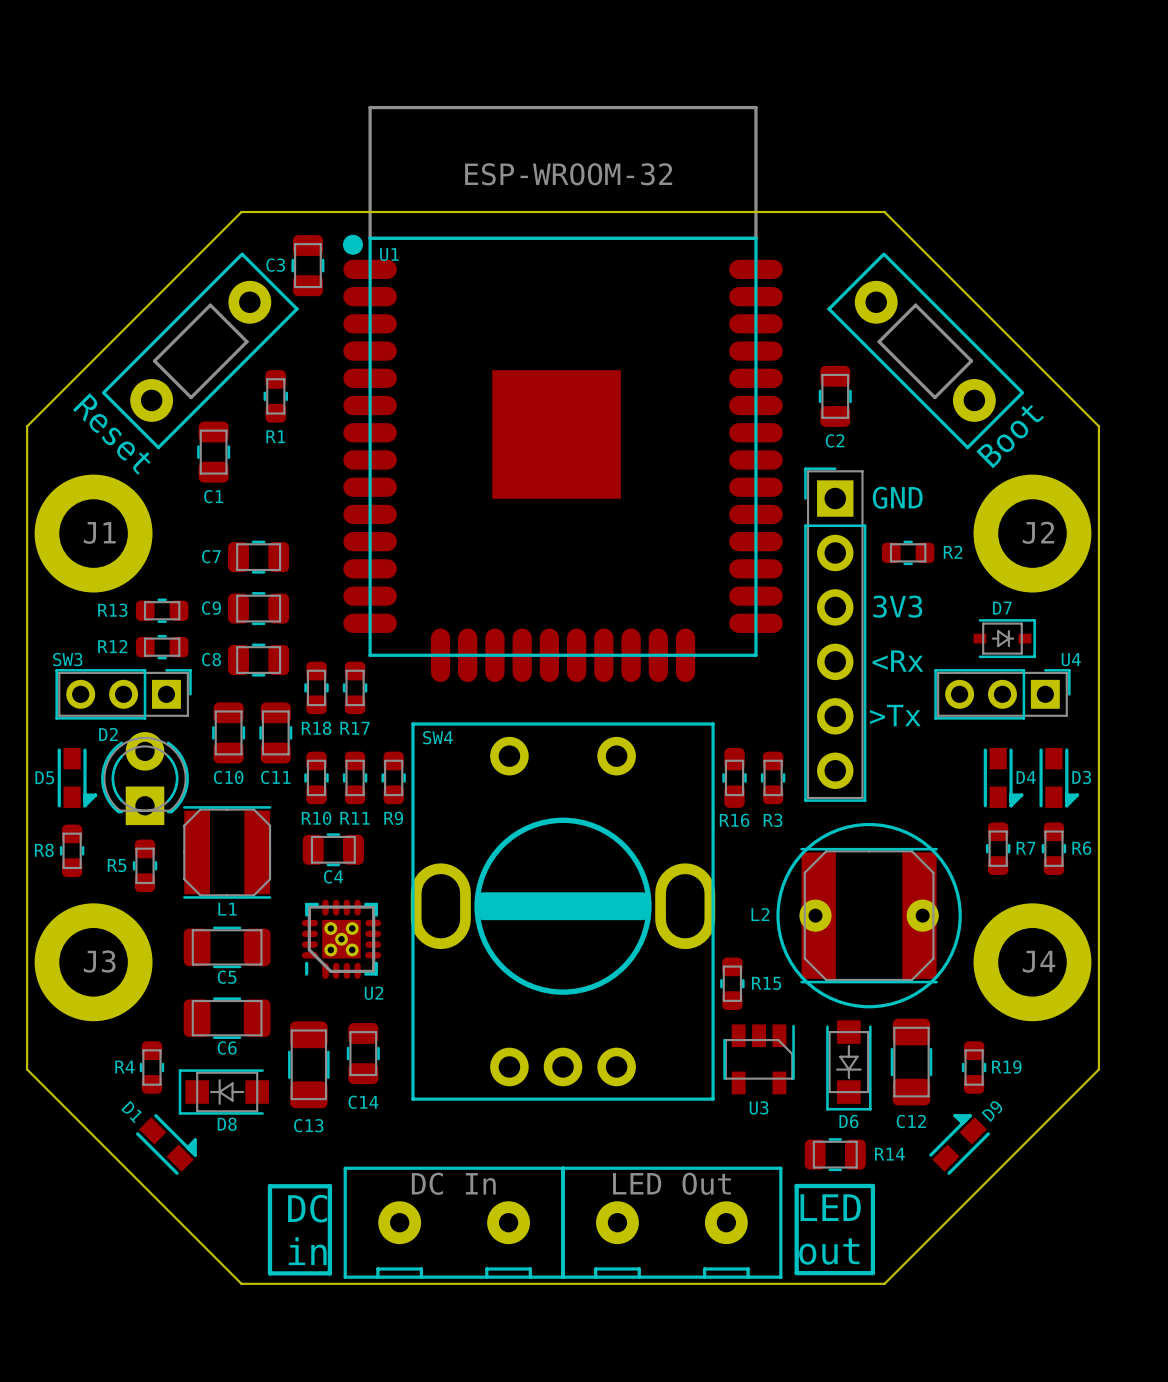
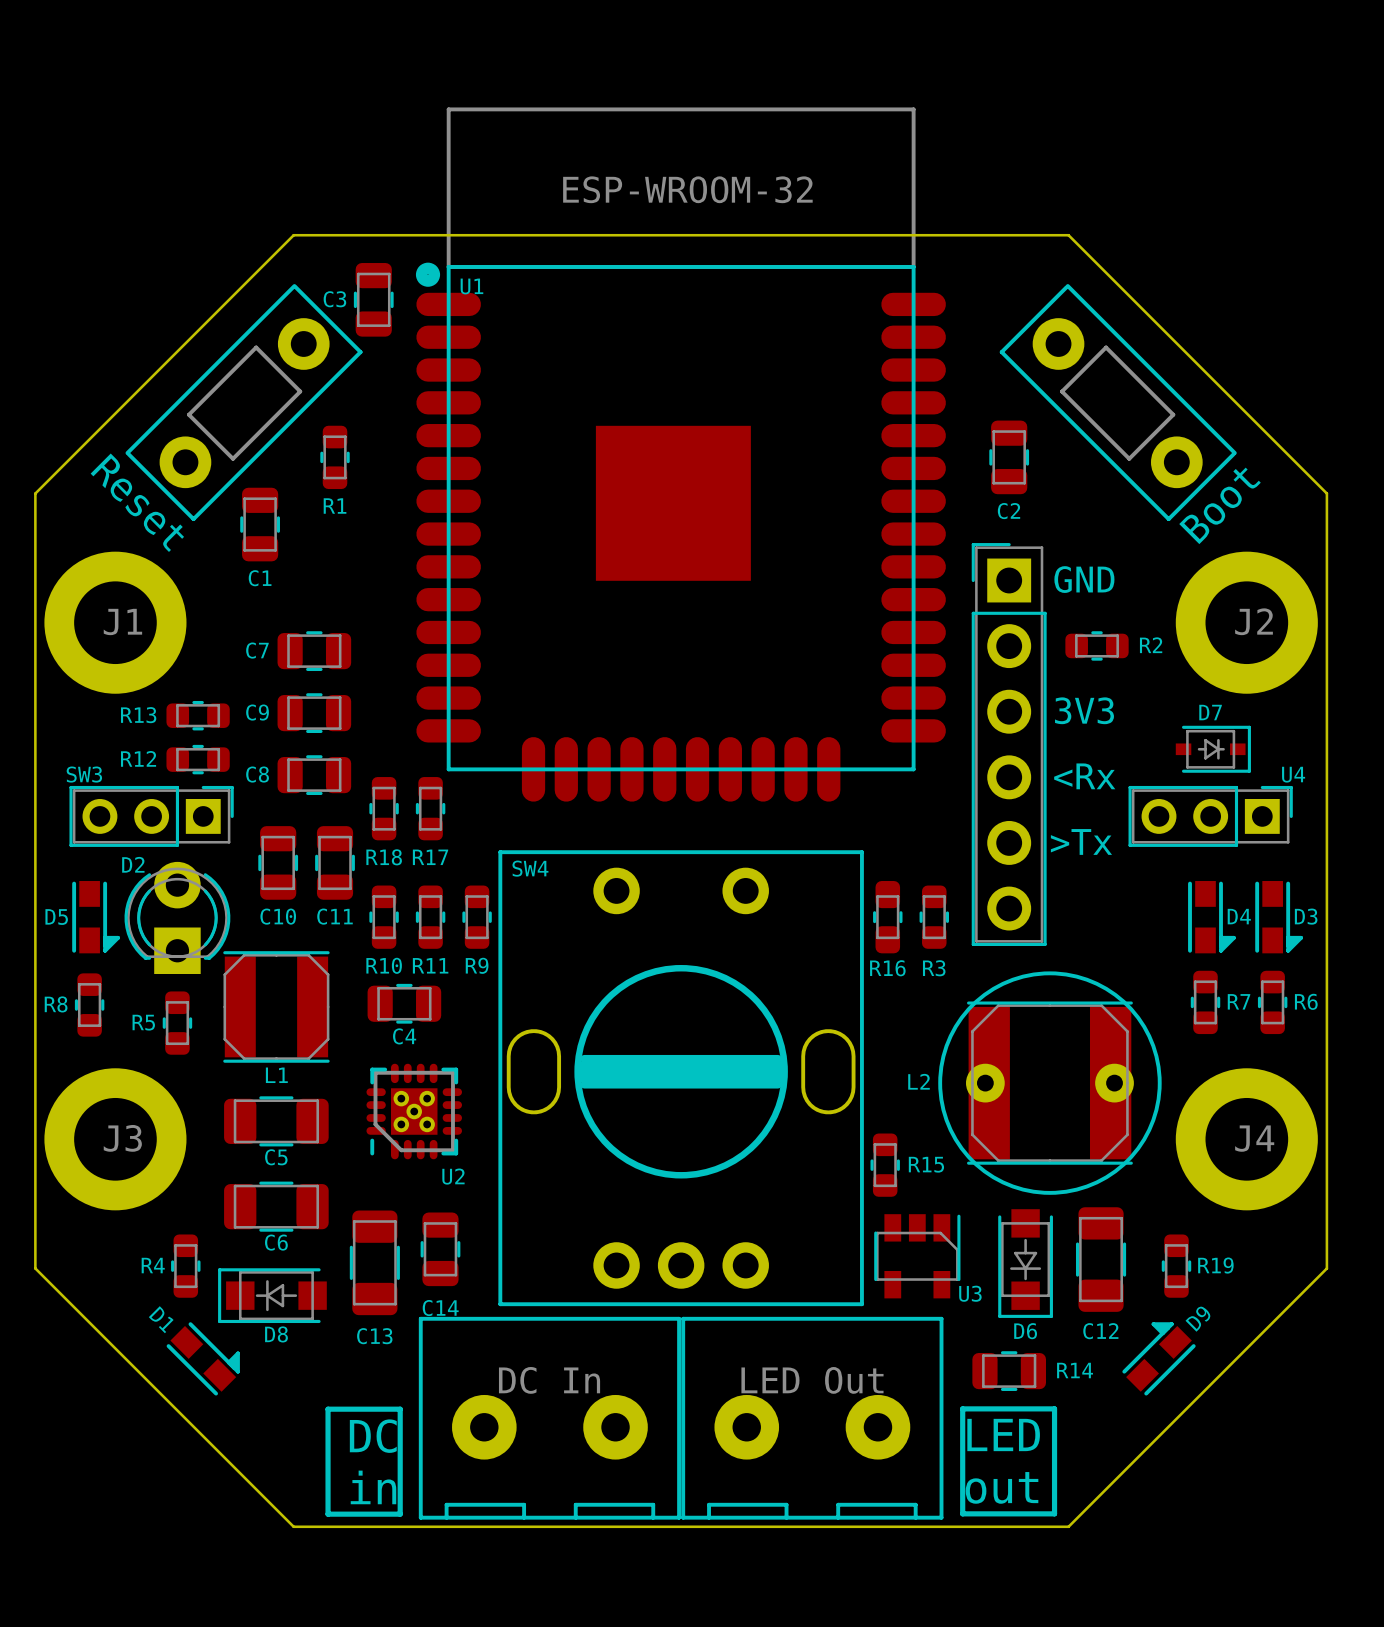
SW4 footprint: [410, 722, 716, 1101] -> [498, 850, 864, 1307]
U3 name position: U3 (759, 1107) -> U3 (970, 1293)
part: none -> DC In (549, 1418)
part: none -> LED Out (812, 1418)
part: DC In (454, 1222) -> none
part: LED Out (671, 1222) -> none

